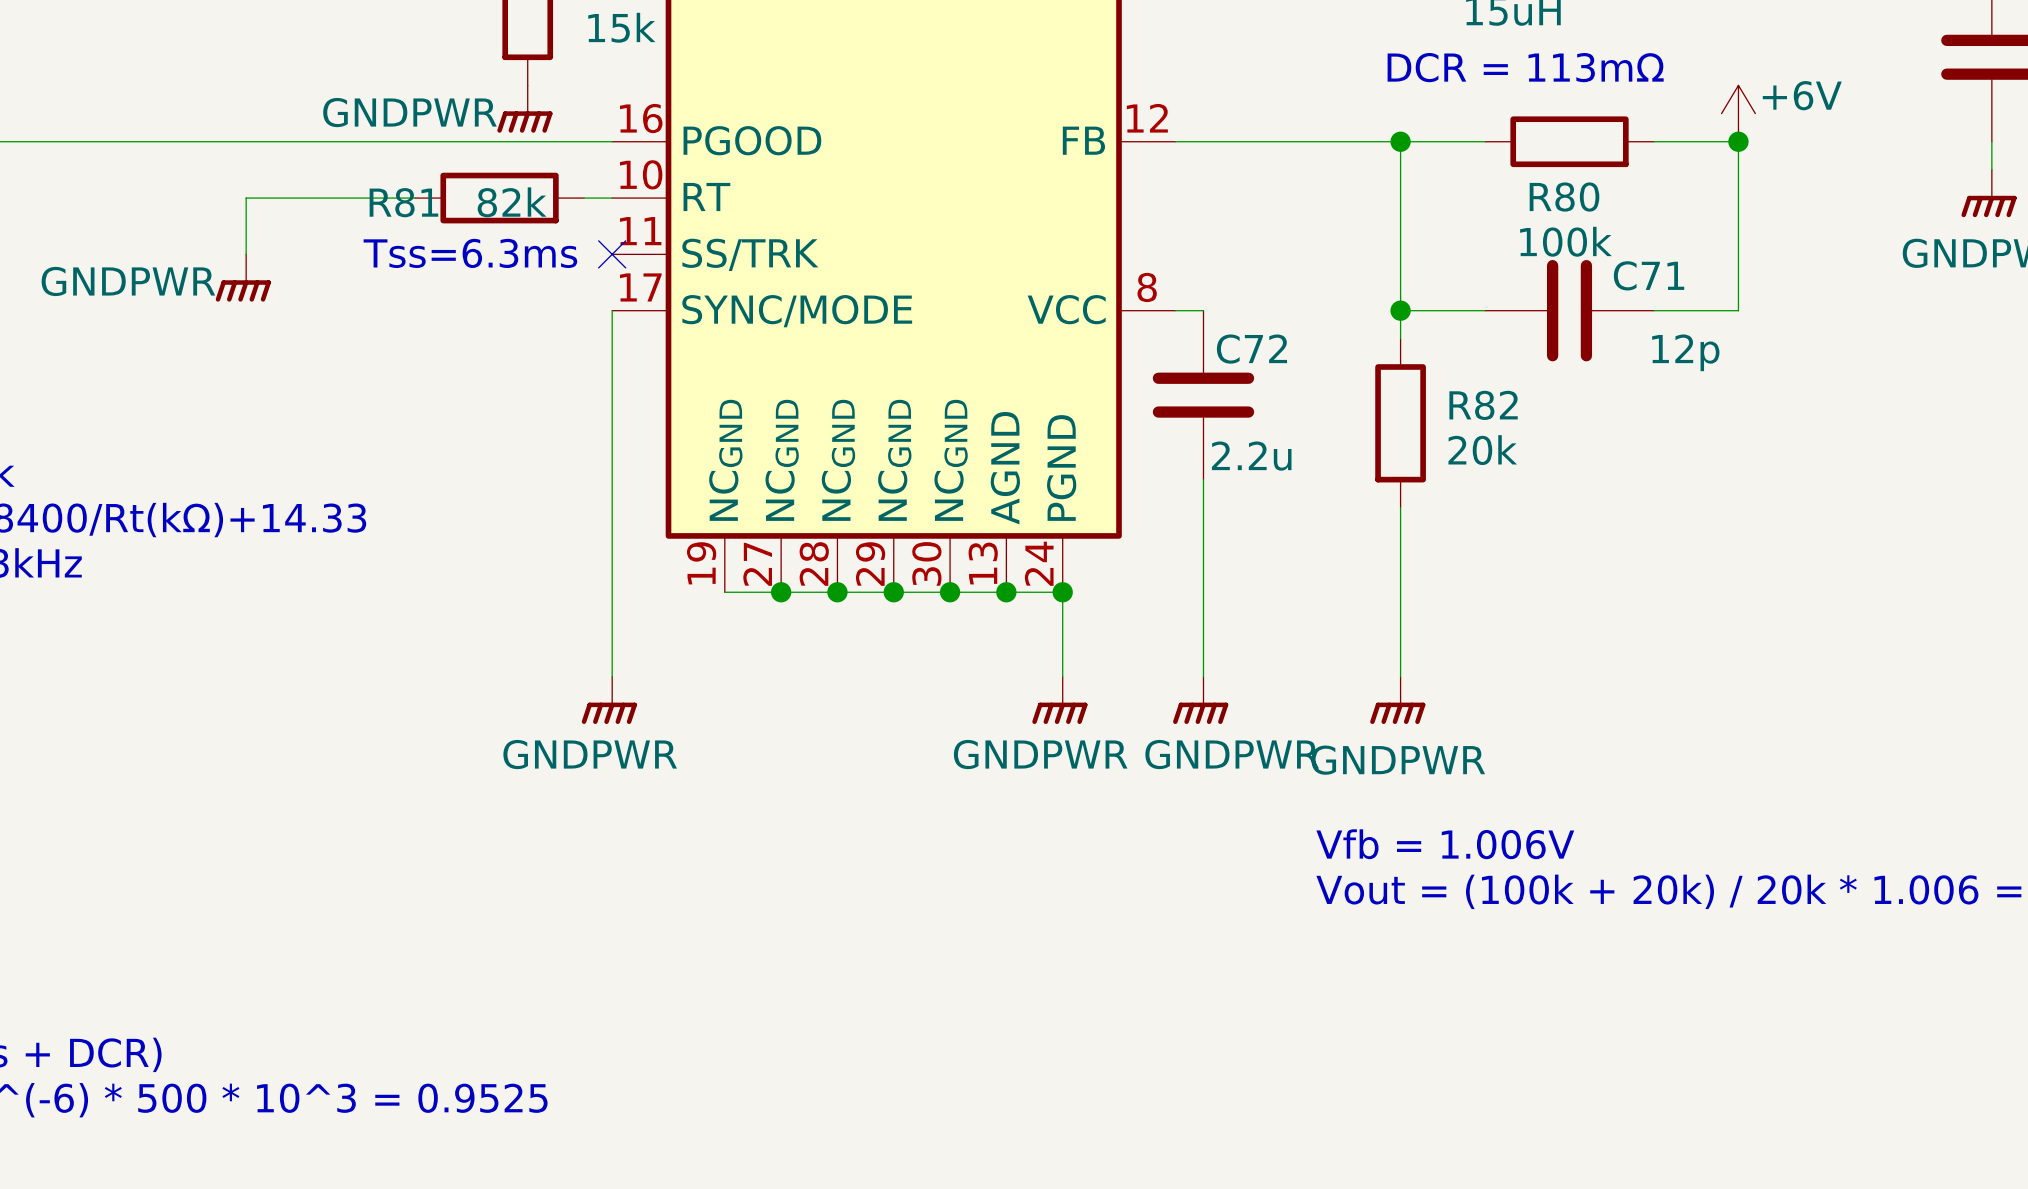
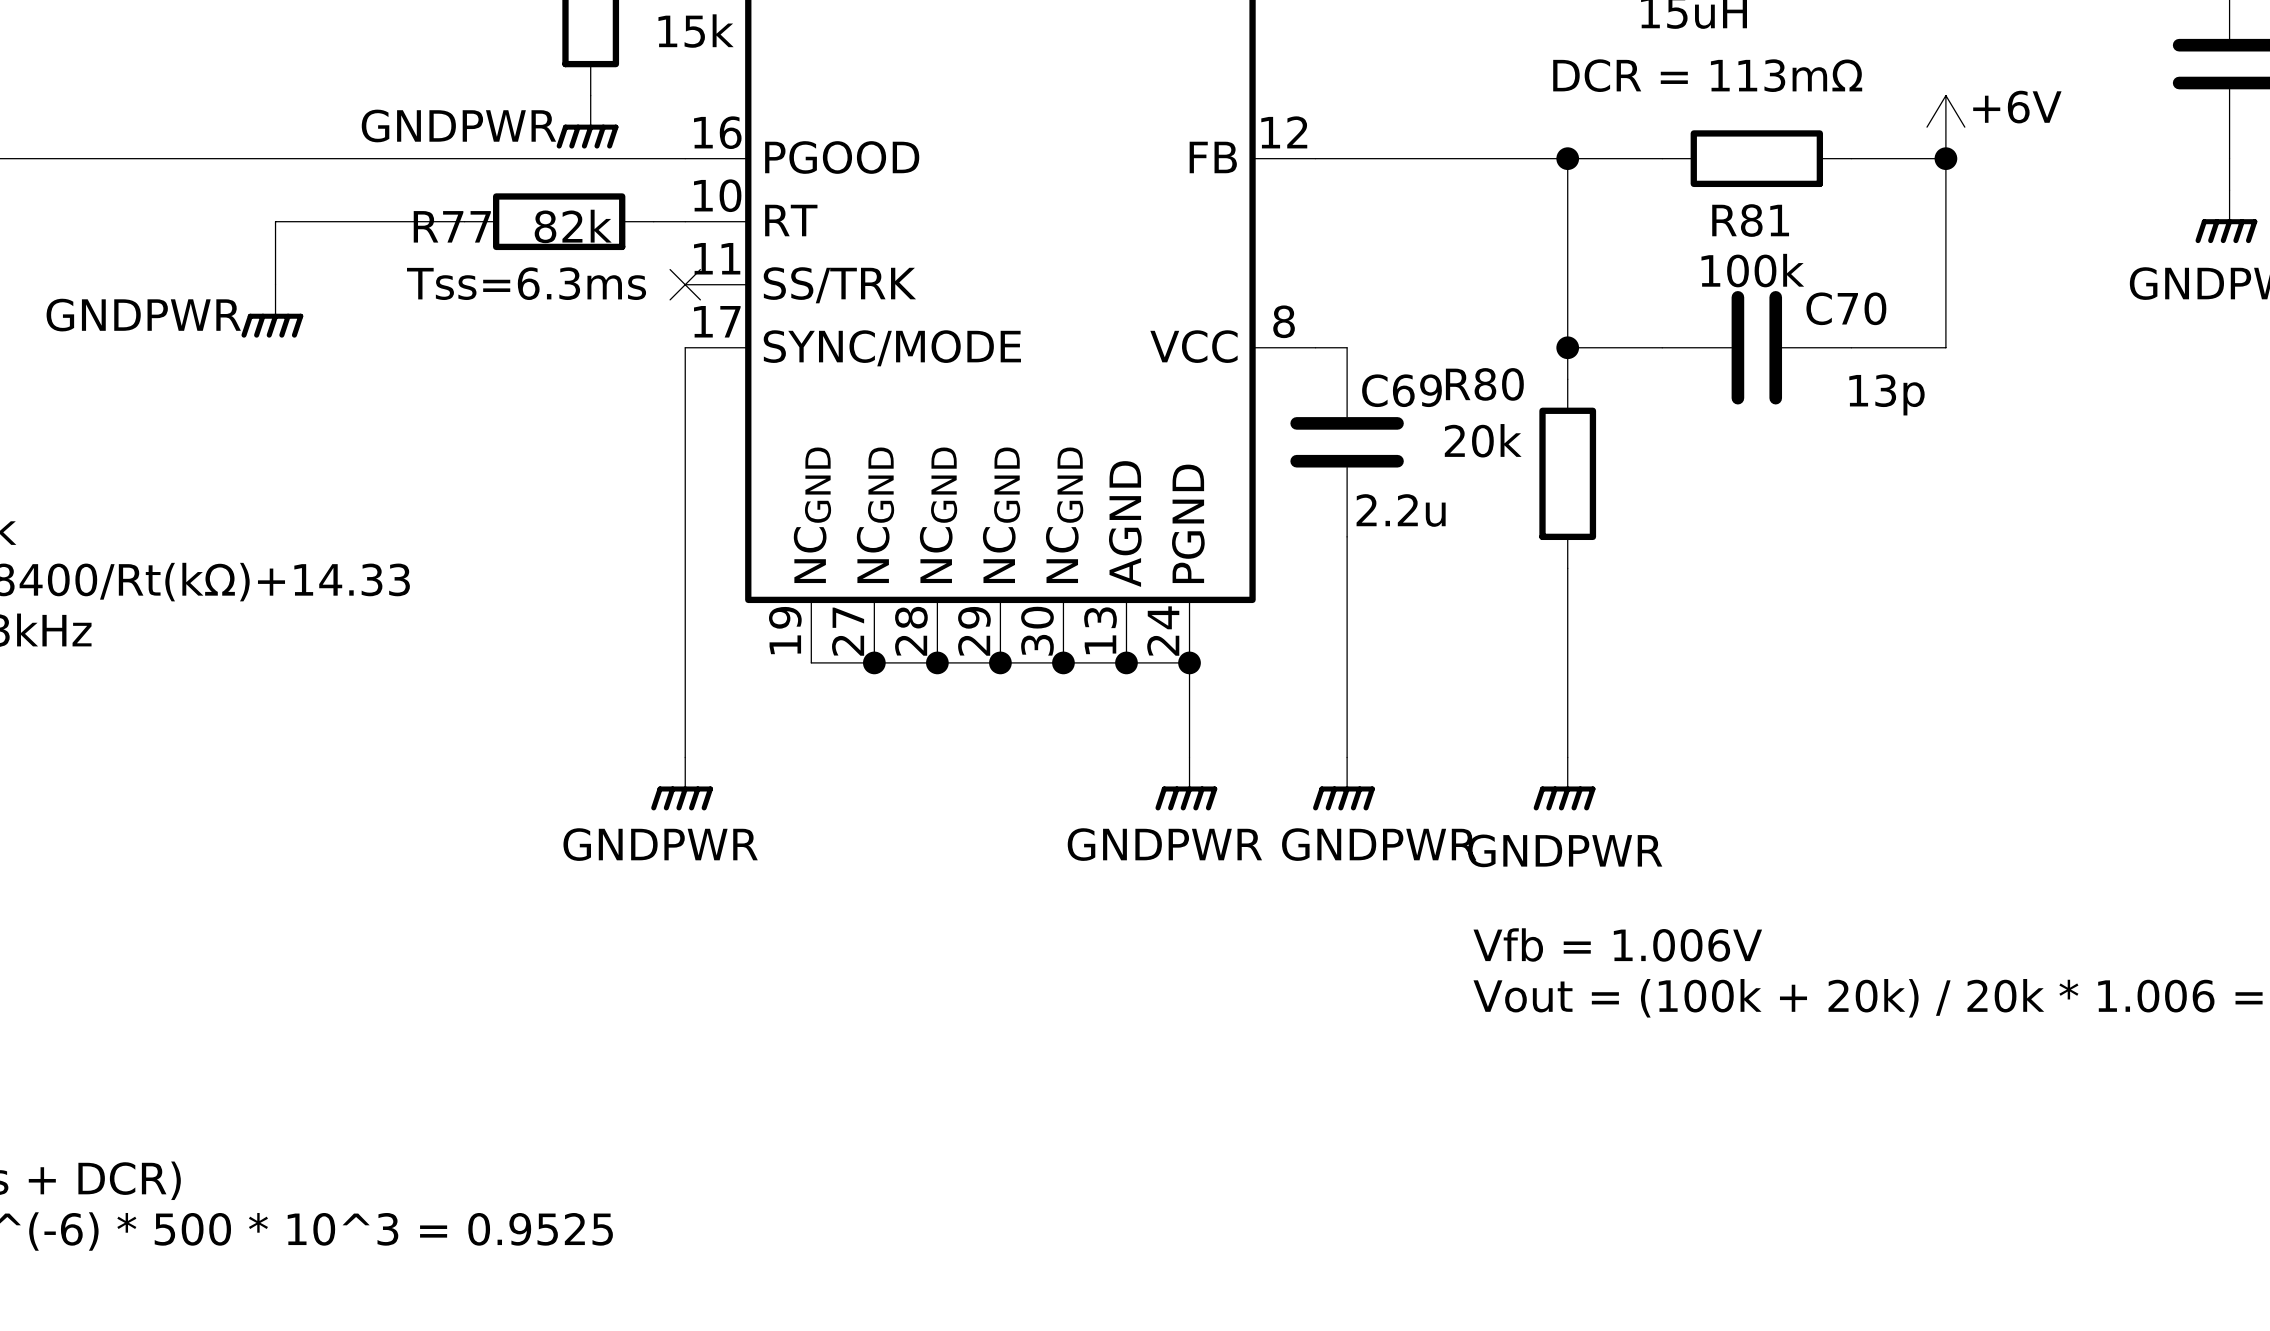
R80 name: R80 (1564, 197) -> R81 (1750, 220)
R81 name: R81 (403, 202) -> R77 (452, 226)
C71 name: C71 (1649, 275) -> C70 (1846, 308)
C72 name: C72 (1251, 349) -> C69 (1401, 390)
C71 value: 12p (1685, 352) -> 13p (1886, 394)
R82 name: R82 (1483, 405) -> R80 (1484, 384)
R82 value position: 20k (1482, 450) -> 20k (1483, 440)

